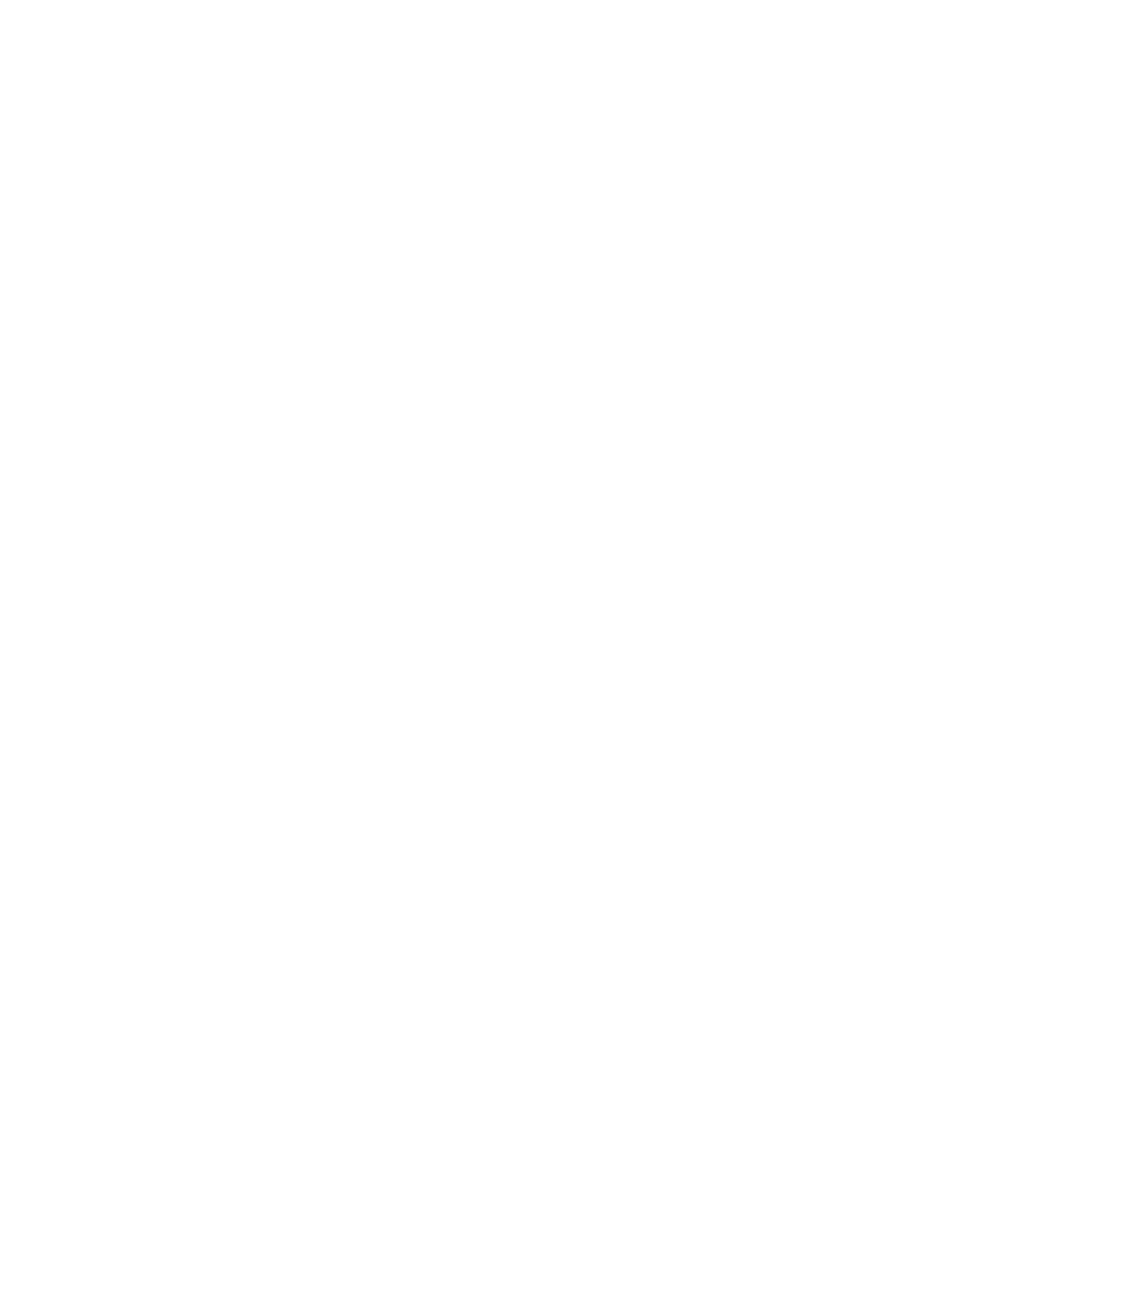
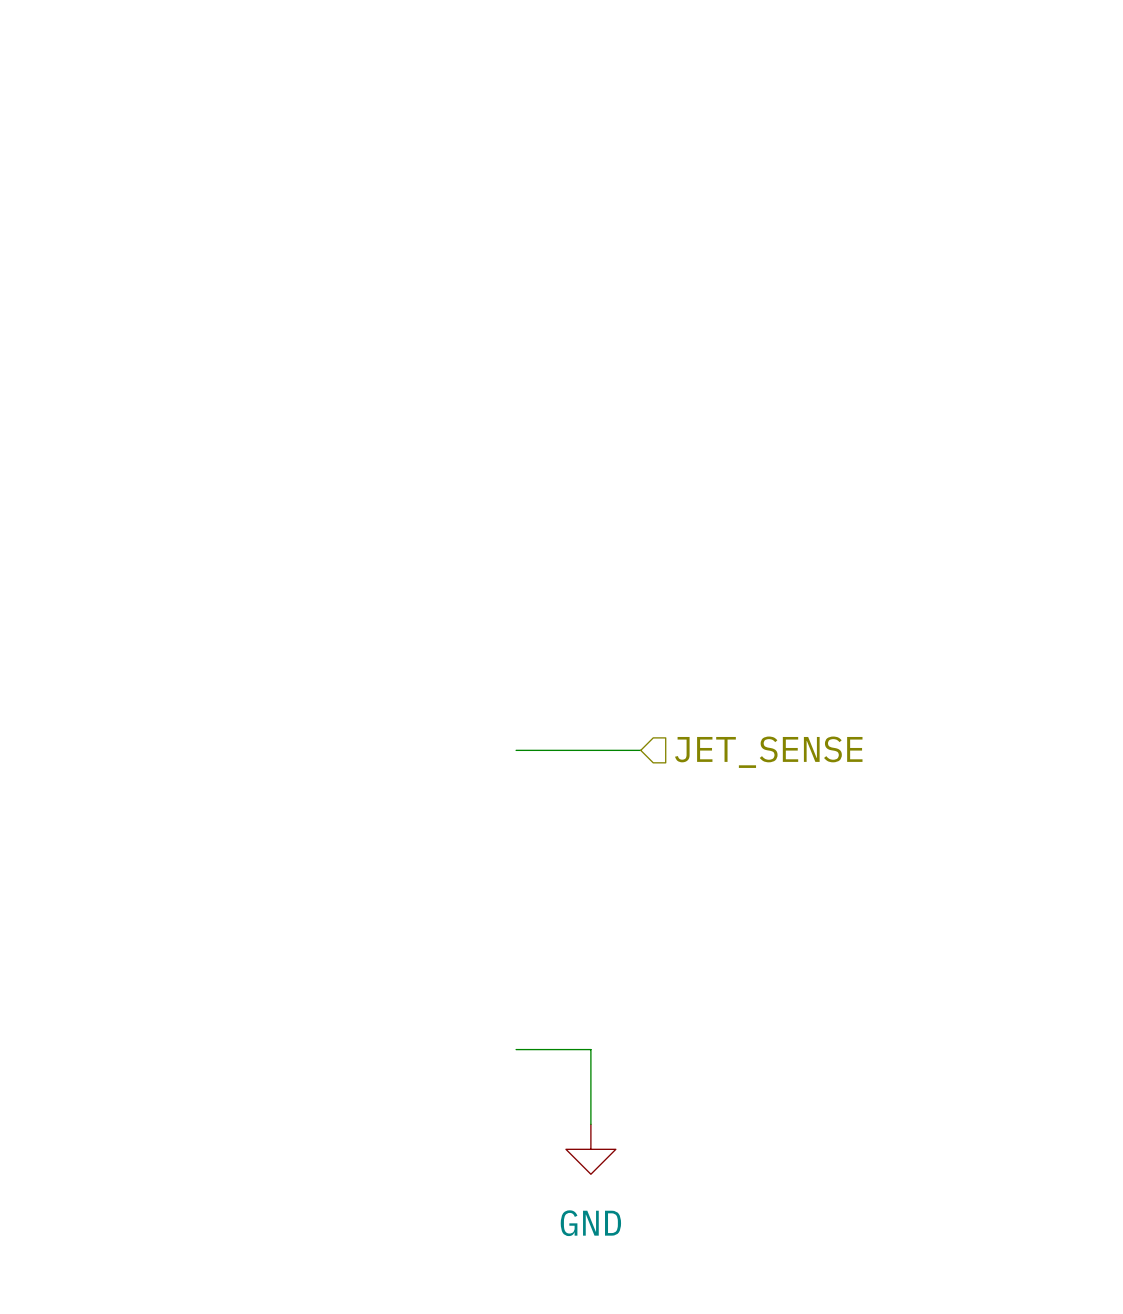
wire: none -> (516, 750) (640, 750)
hierarchical label: none -> JET_SENSE (768, 752)
wire: none -> (516, 1049) (590, 1049) (590, 1124)
power symbol: none -> GND (590, 1149)

